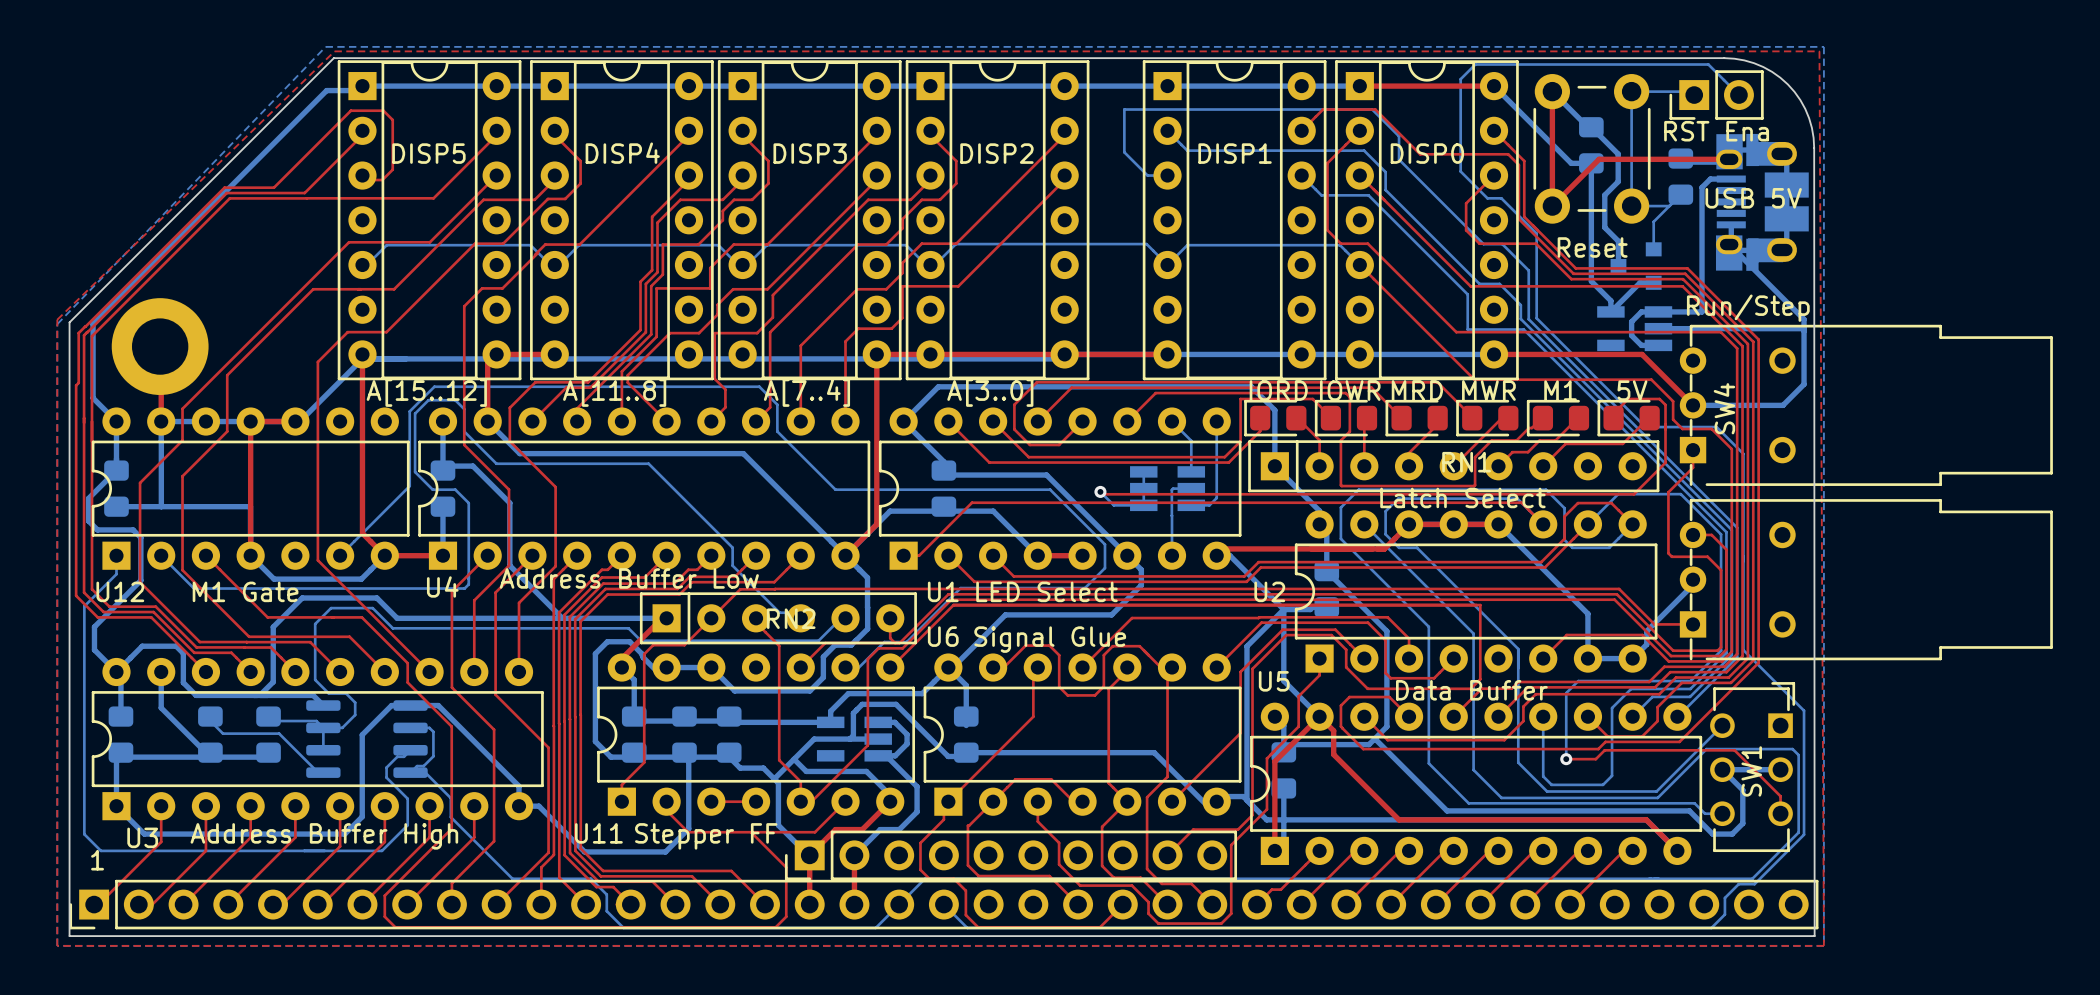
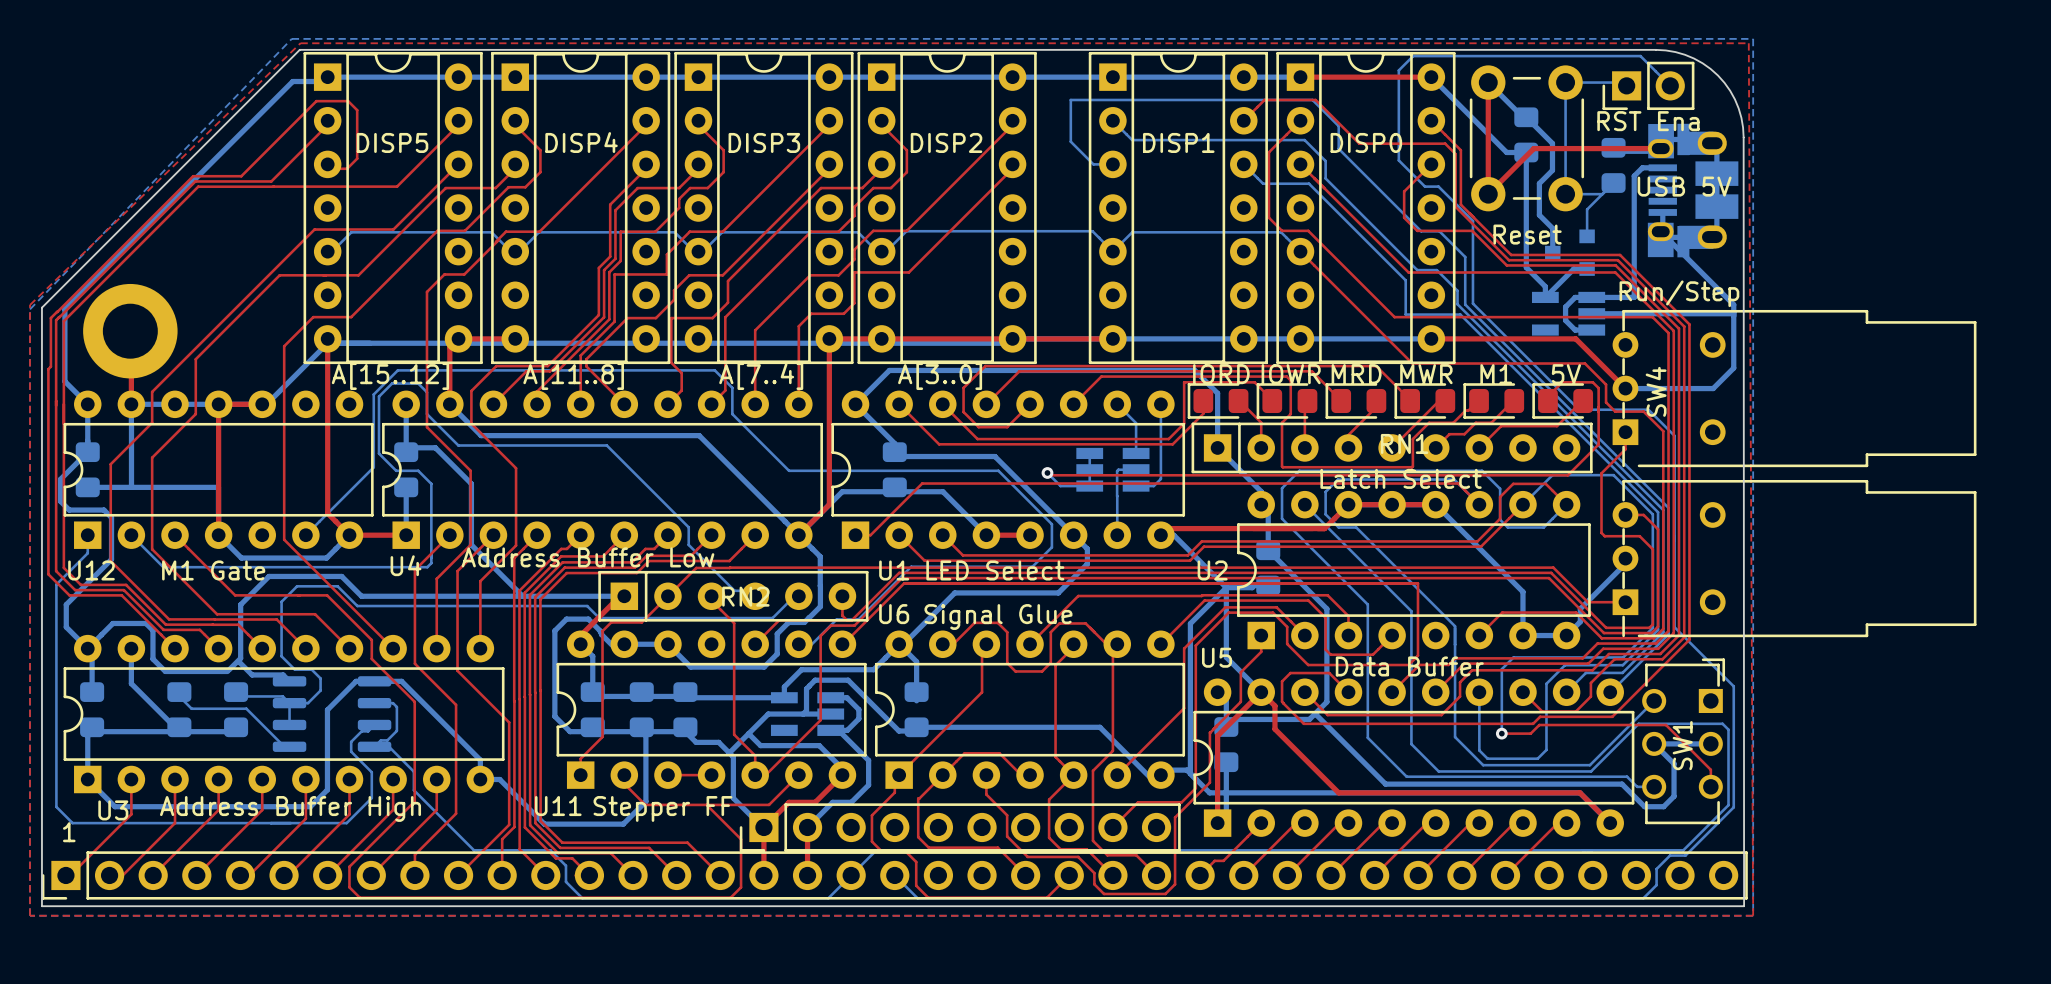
bottom track: (259, 695) (313, 695) (316, 699) -> (239, 662) (252, 674) (283, 674)

